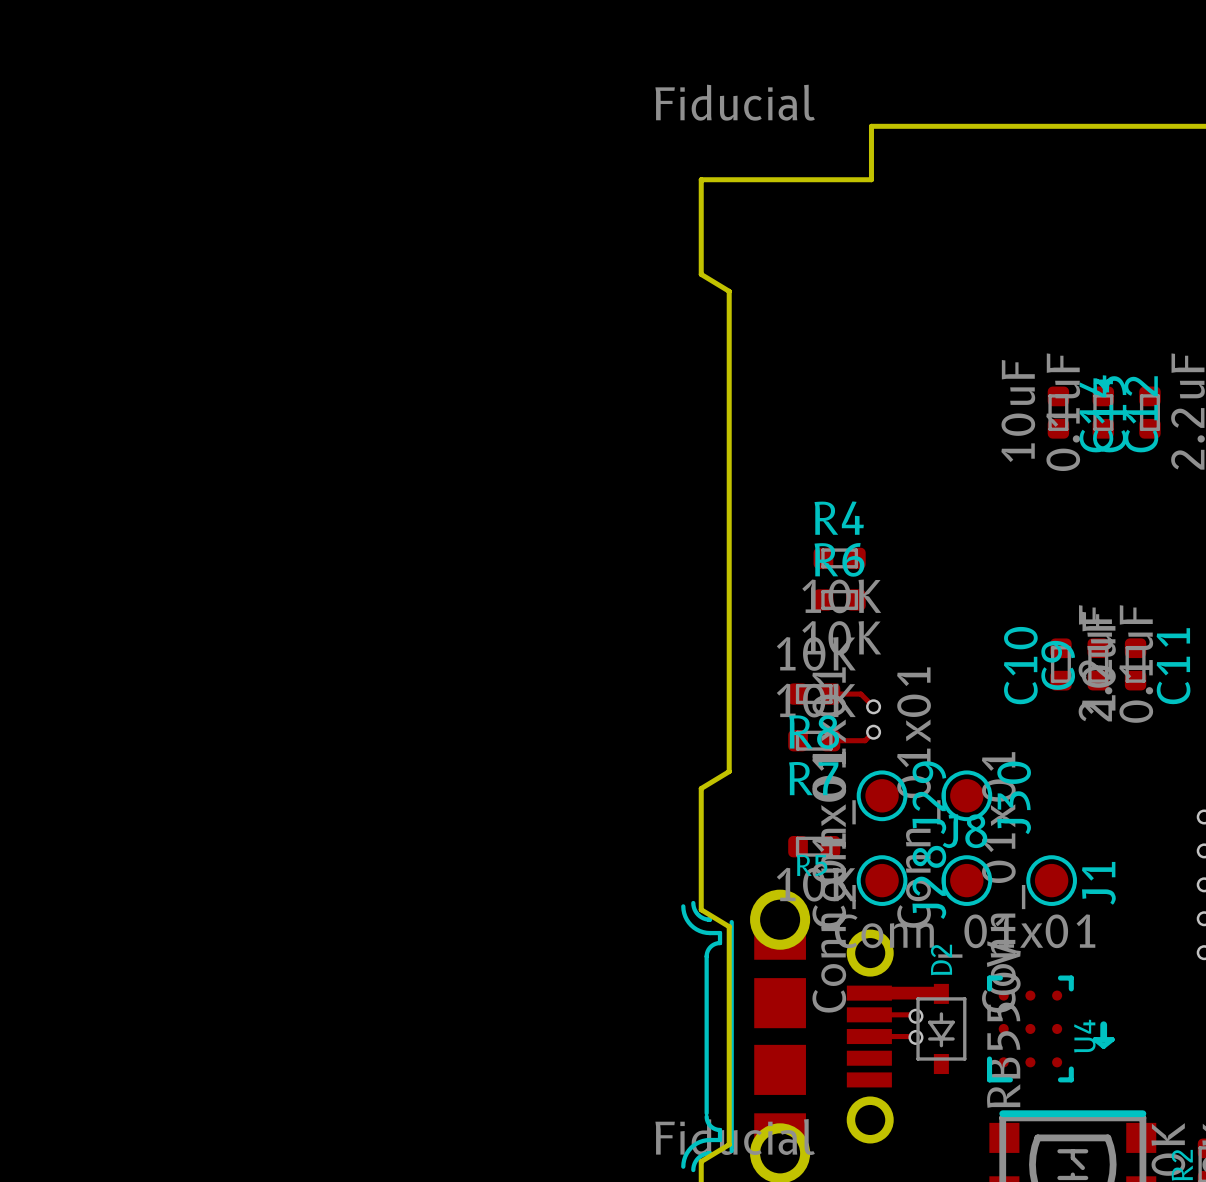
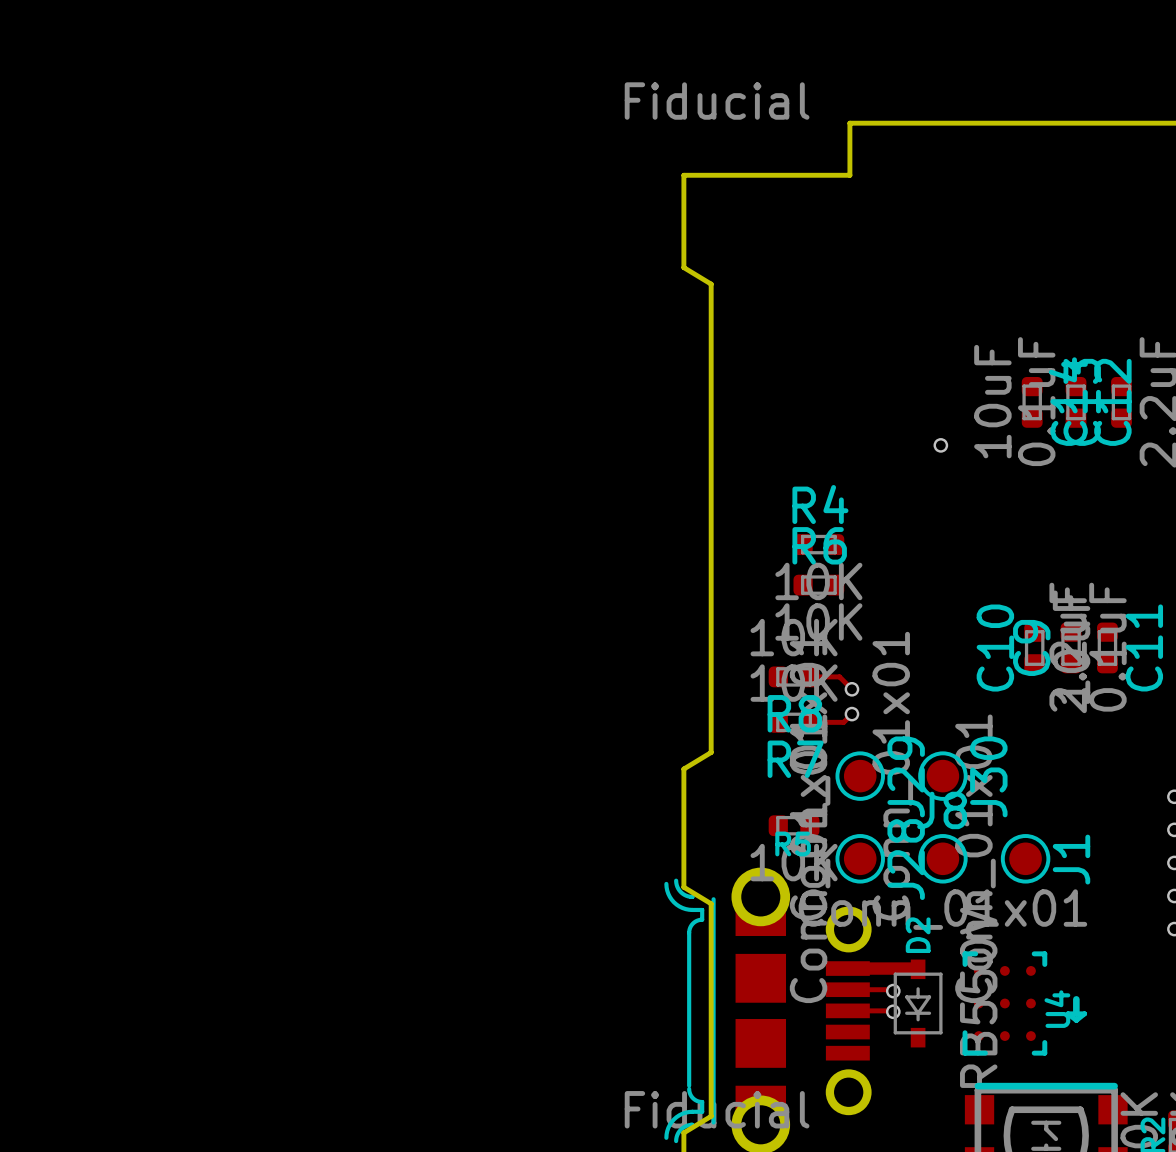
via: none -> (940, 445)

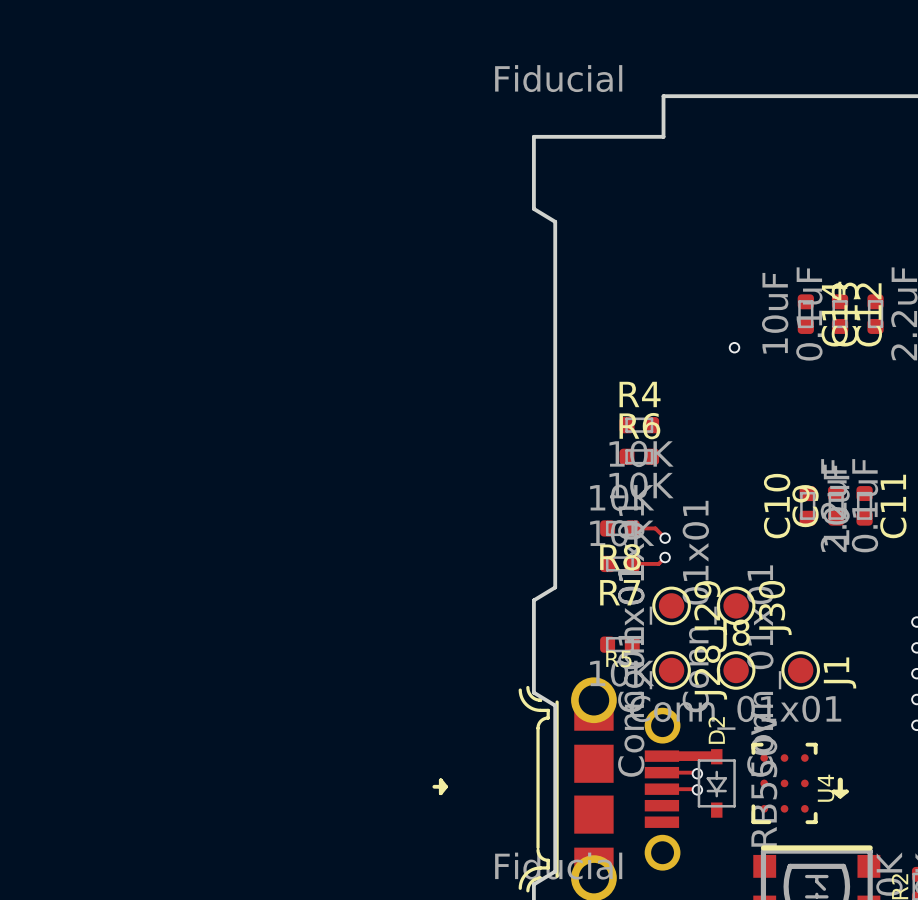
line: none -> (434, 786) (440, 786) (440, 780) (445, 786) (440, 793) (440, 788)

